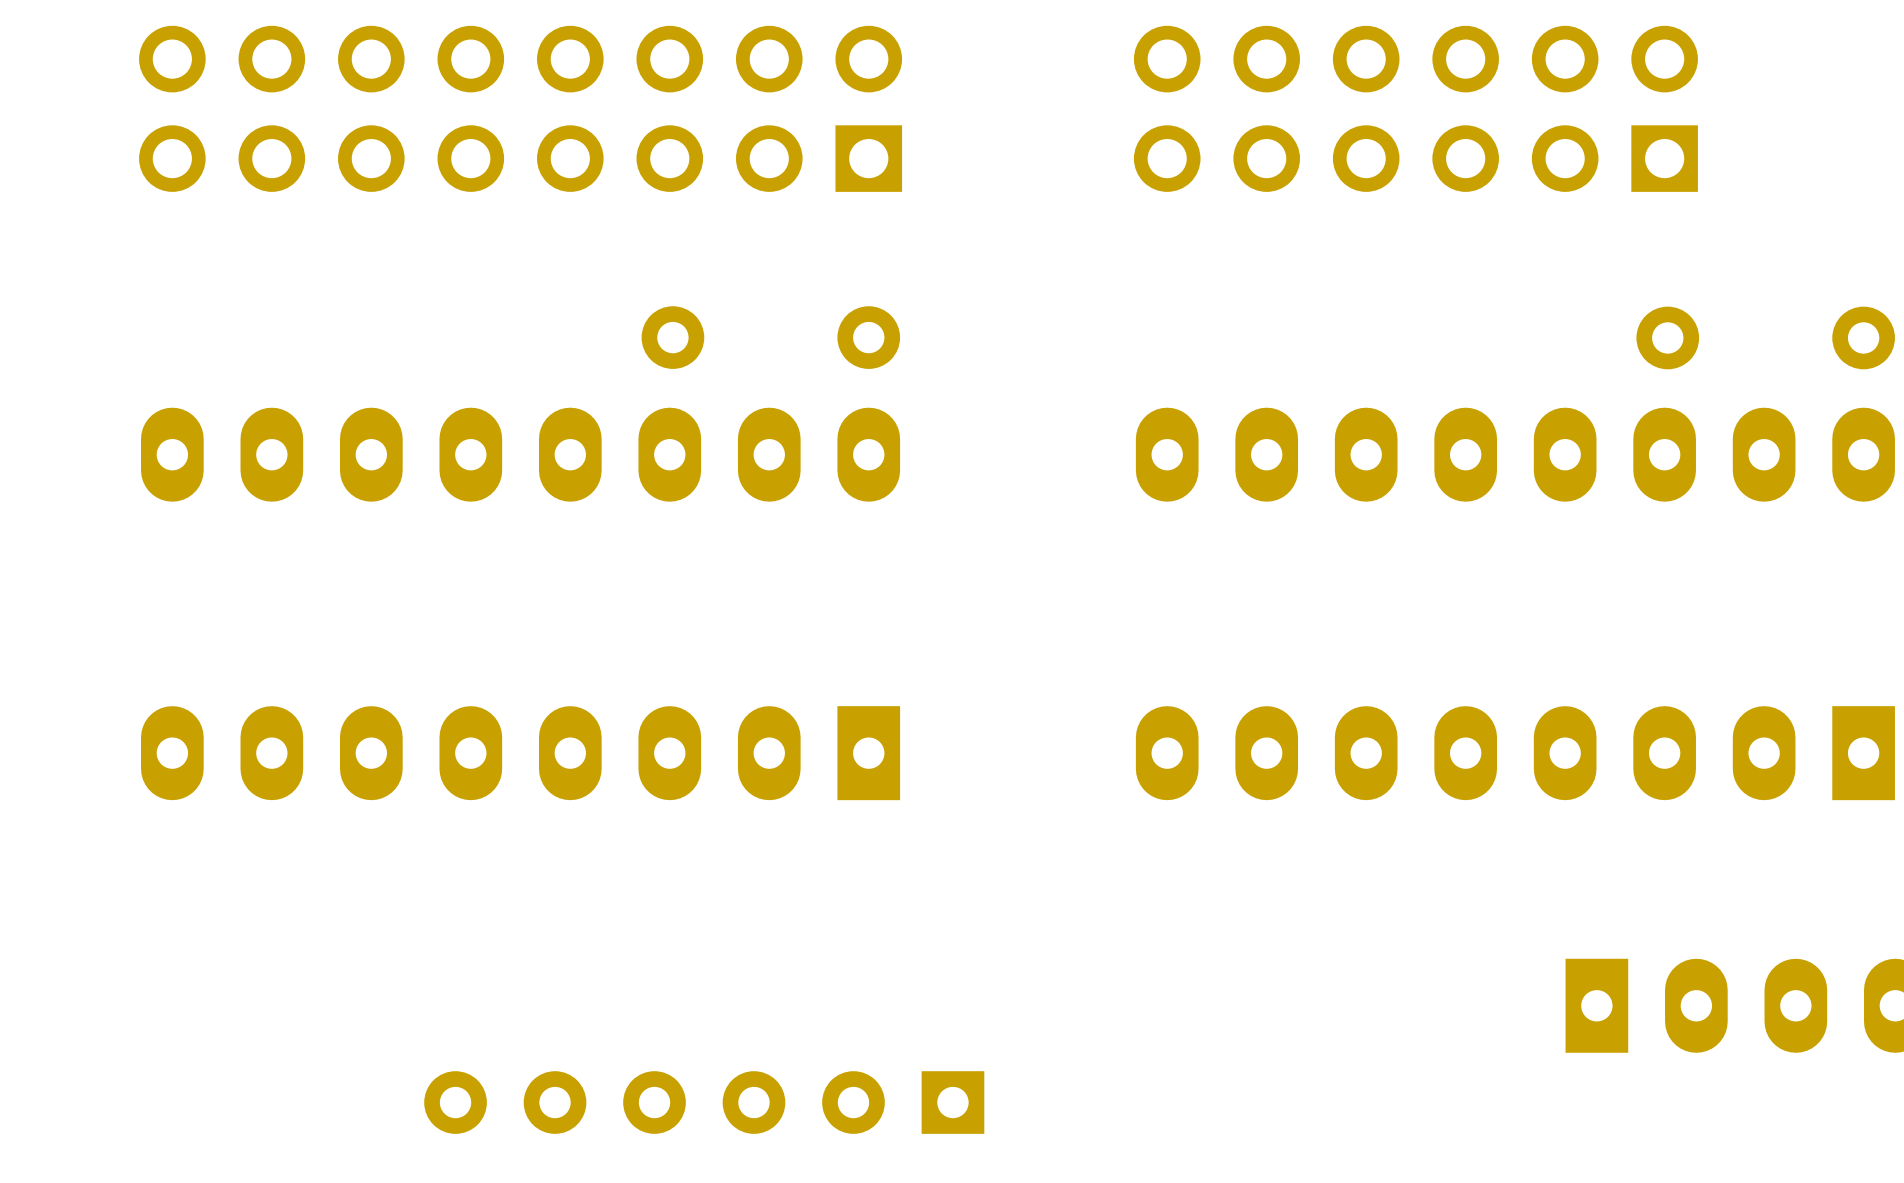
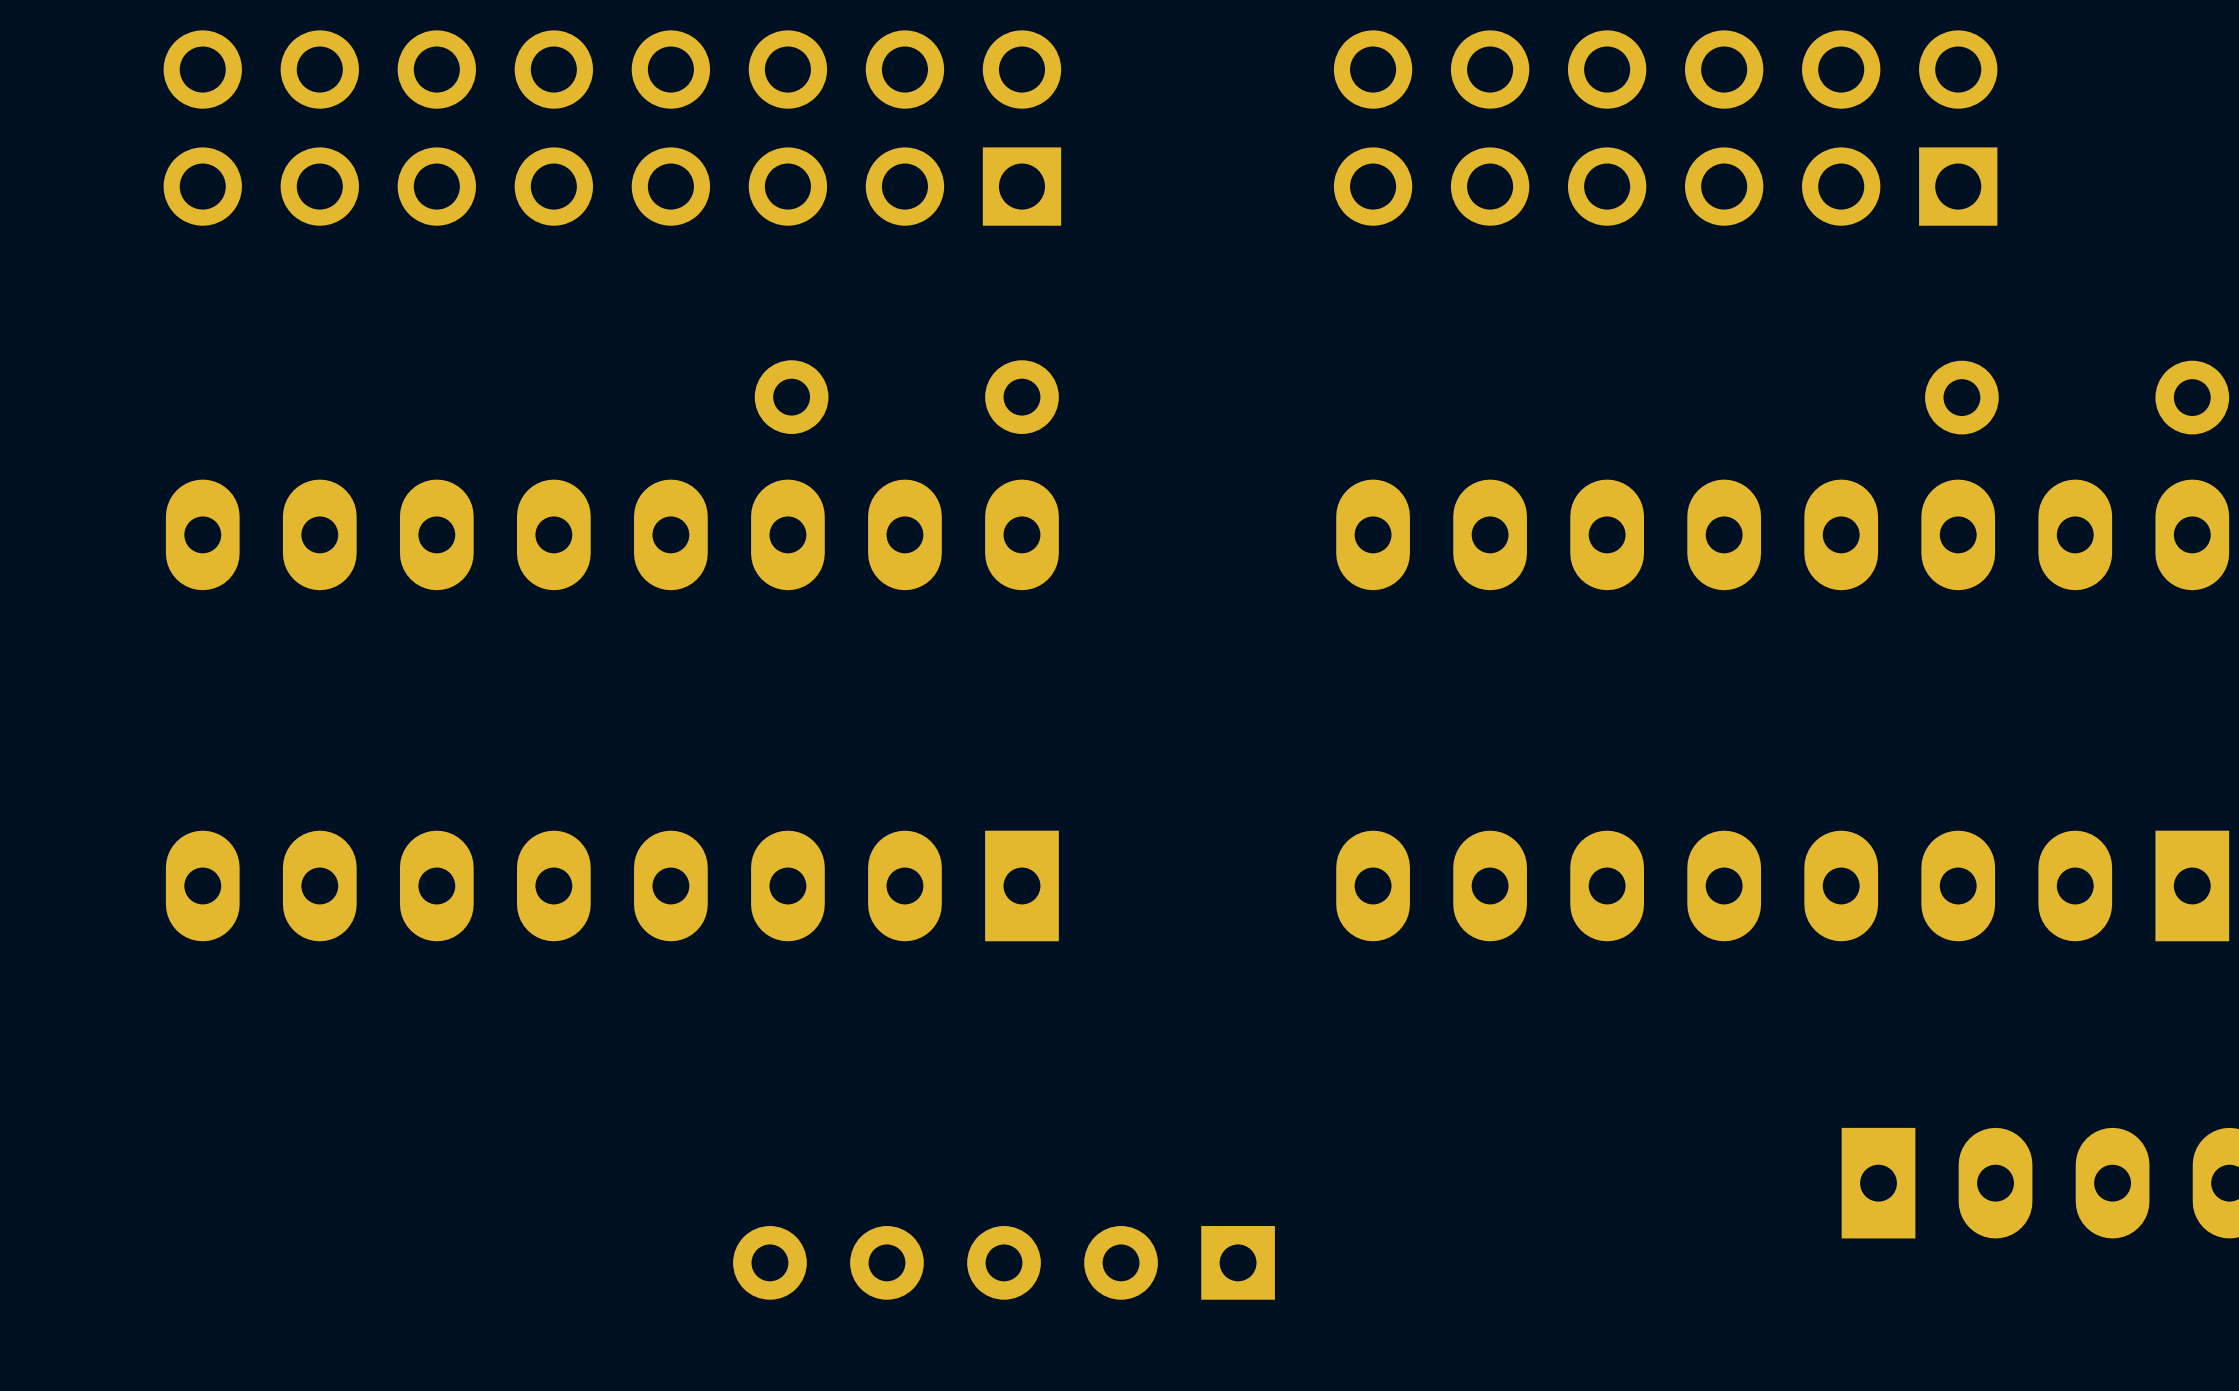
part: none -> (1004, 1262)
part: (704, 1102) -> none

